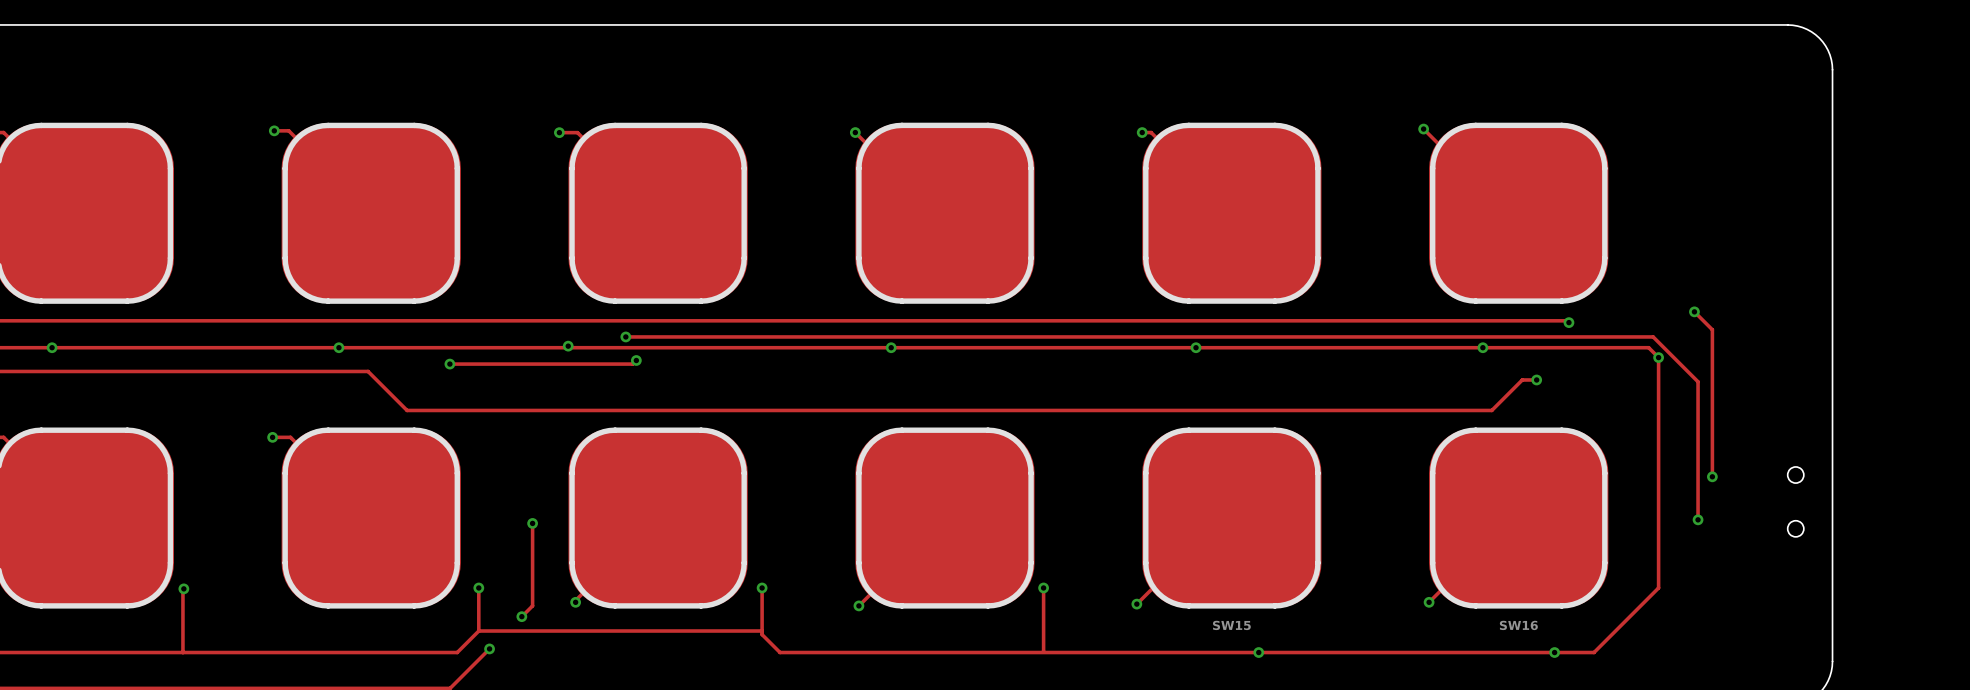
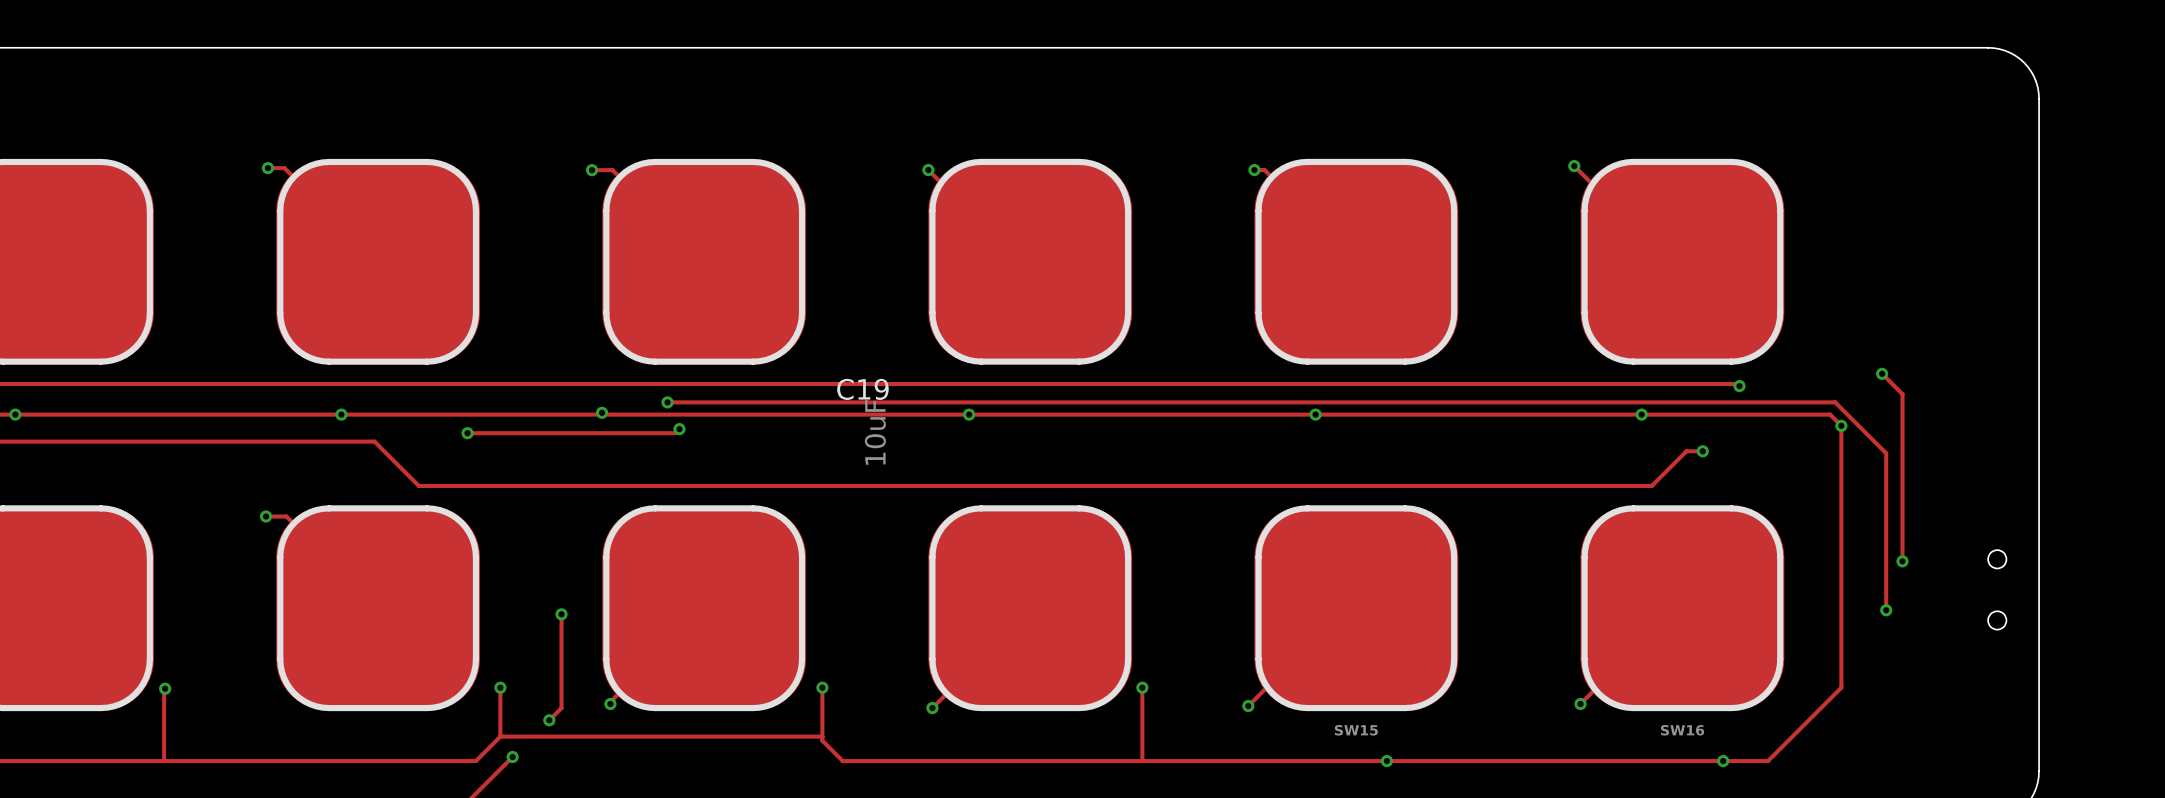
C19: none -> 10uF (862, 421)

